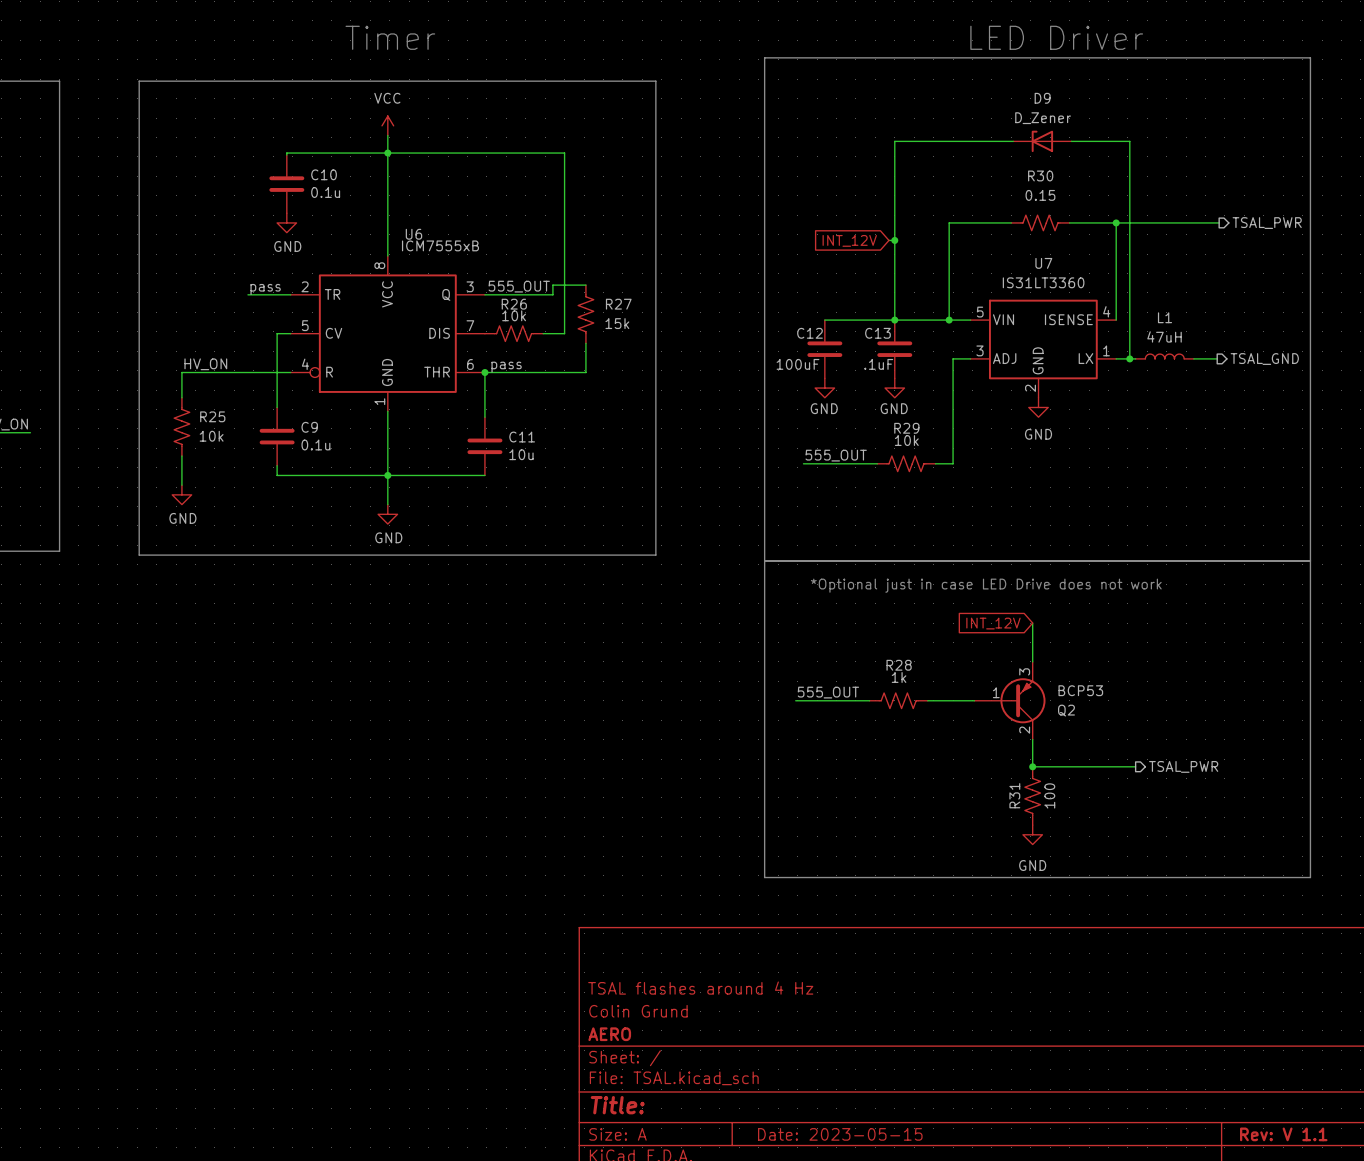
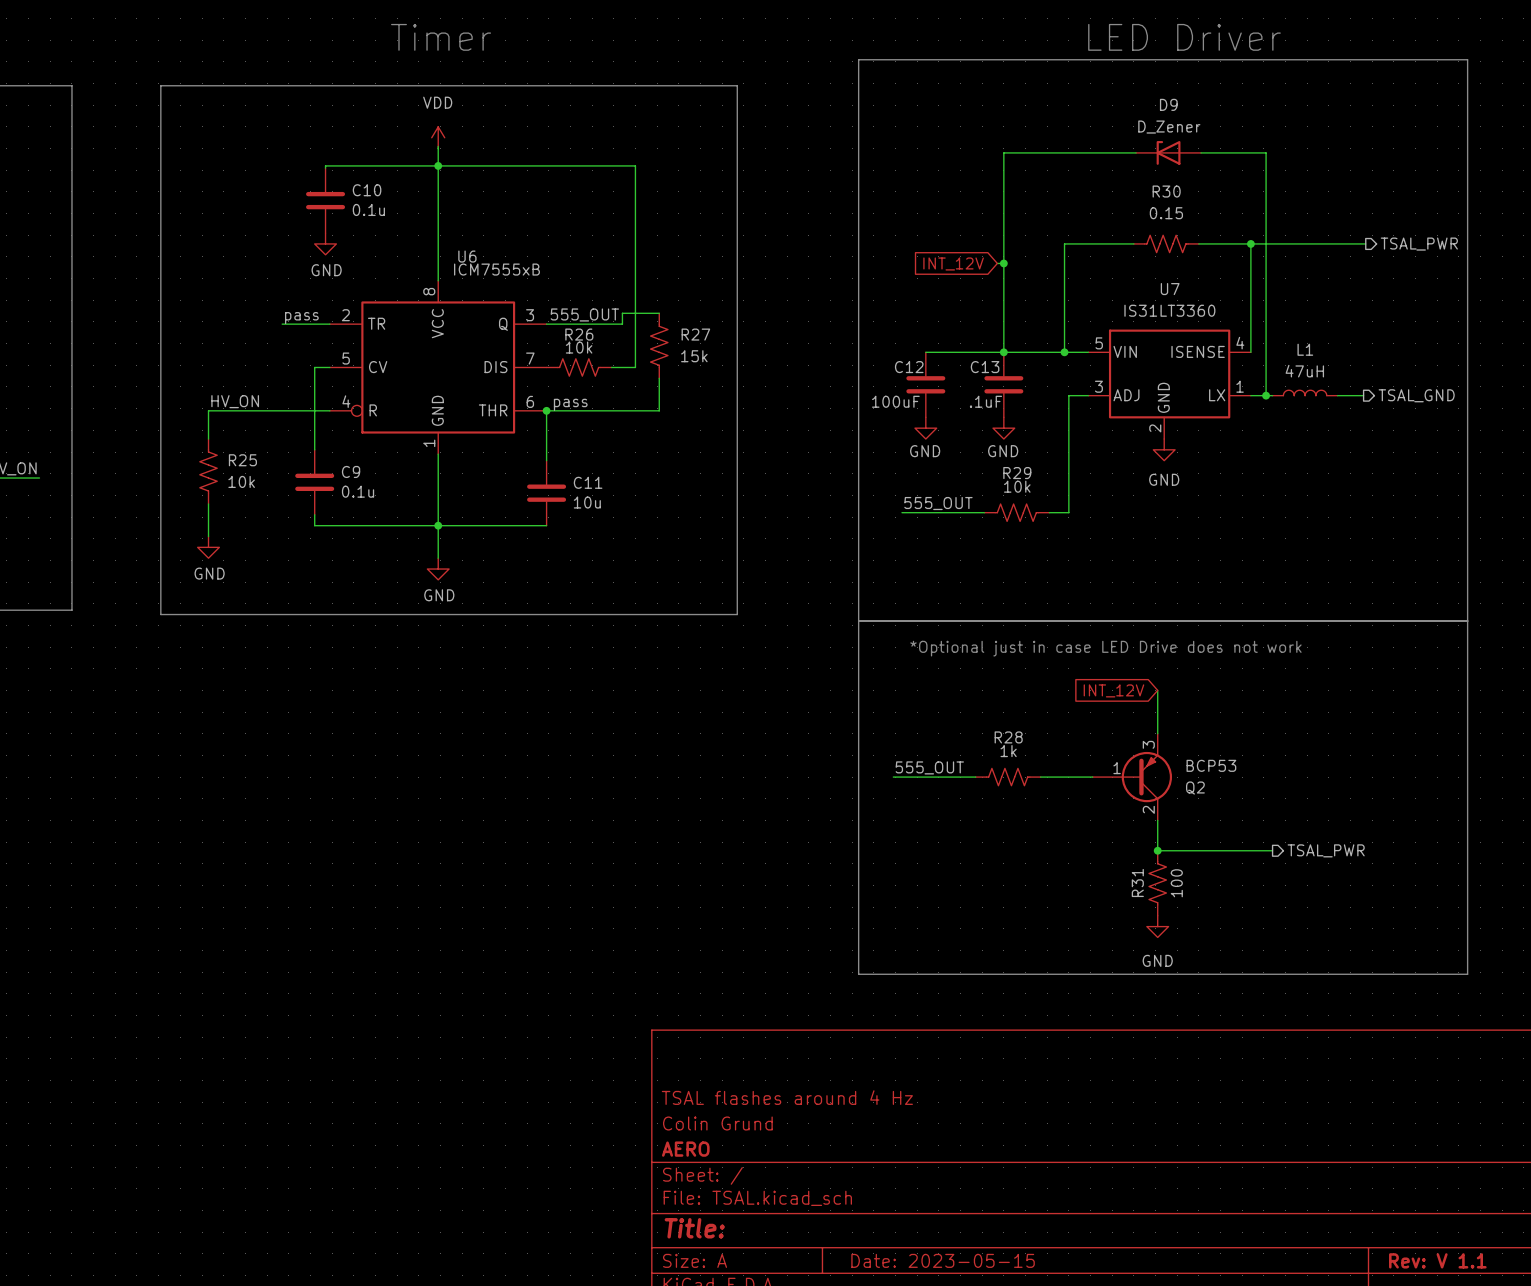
power symbol: VCC (387, 125) -> VDD (438, 137)

